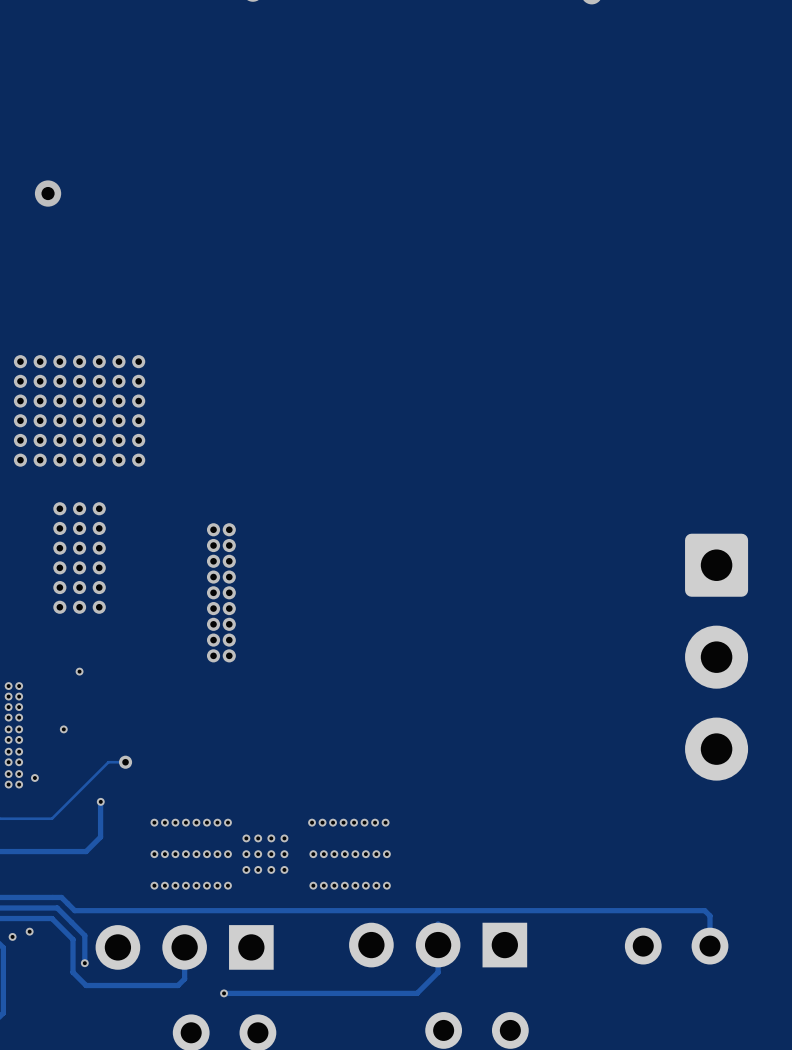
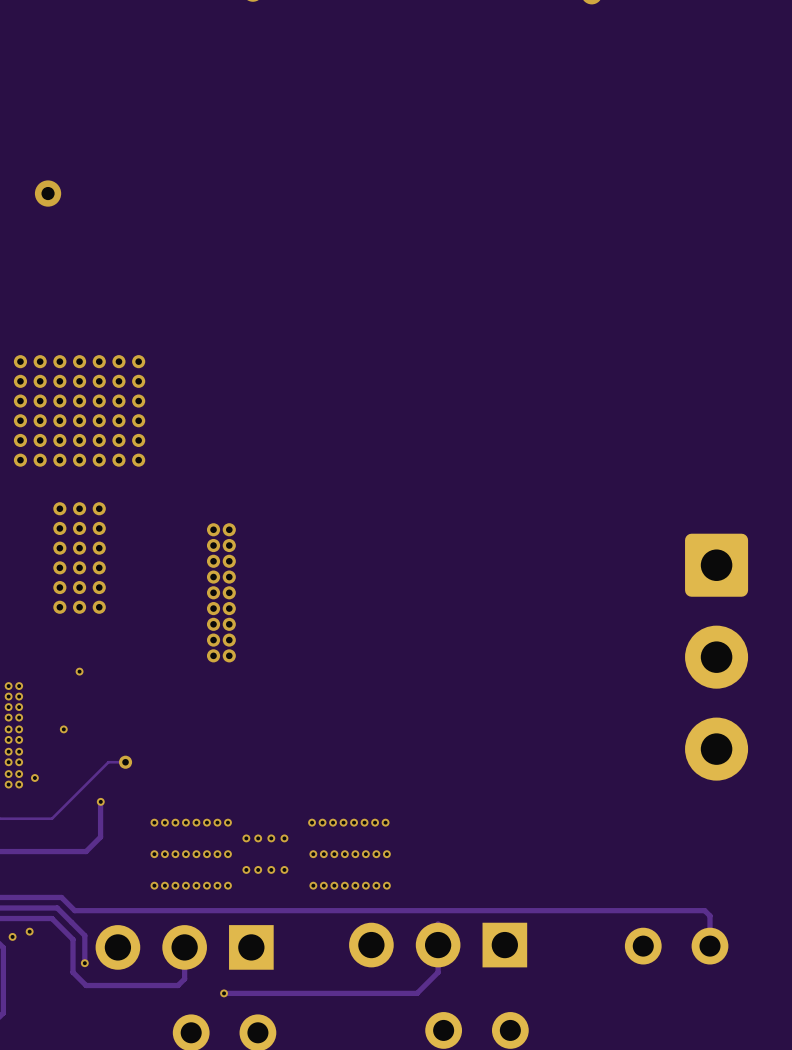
via: (246, 854) -> none
via: (258, 854) -> none
via: (271, 854) -> none
via: (284, 854) -> none

